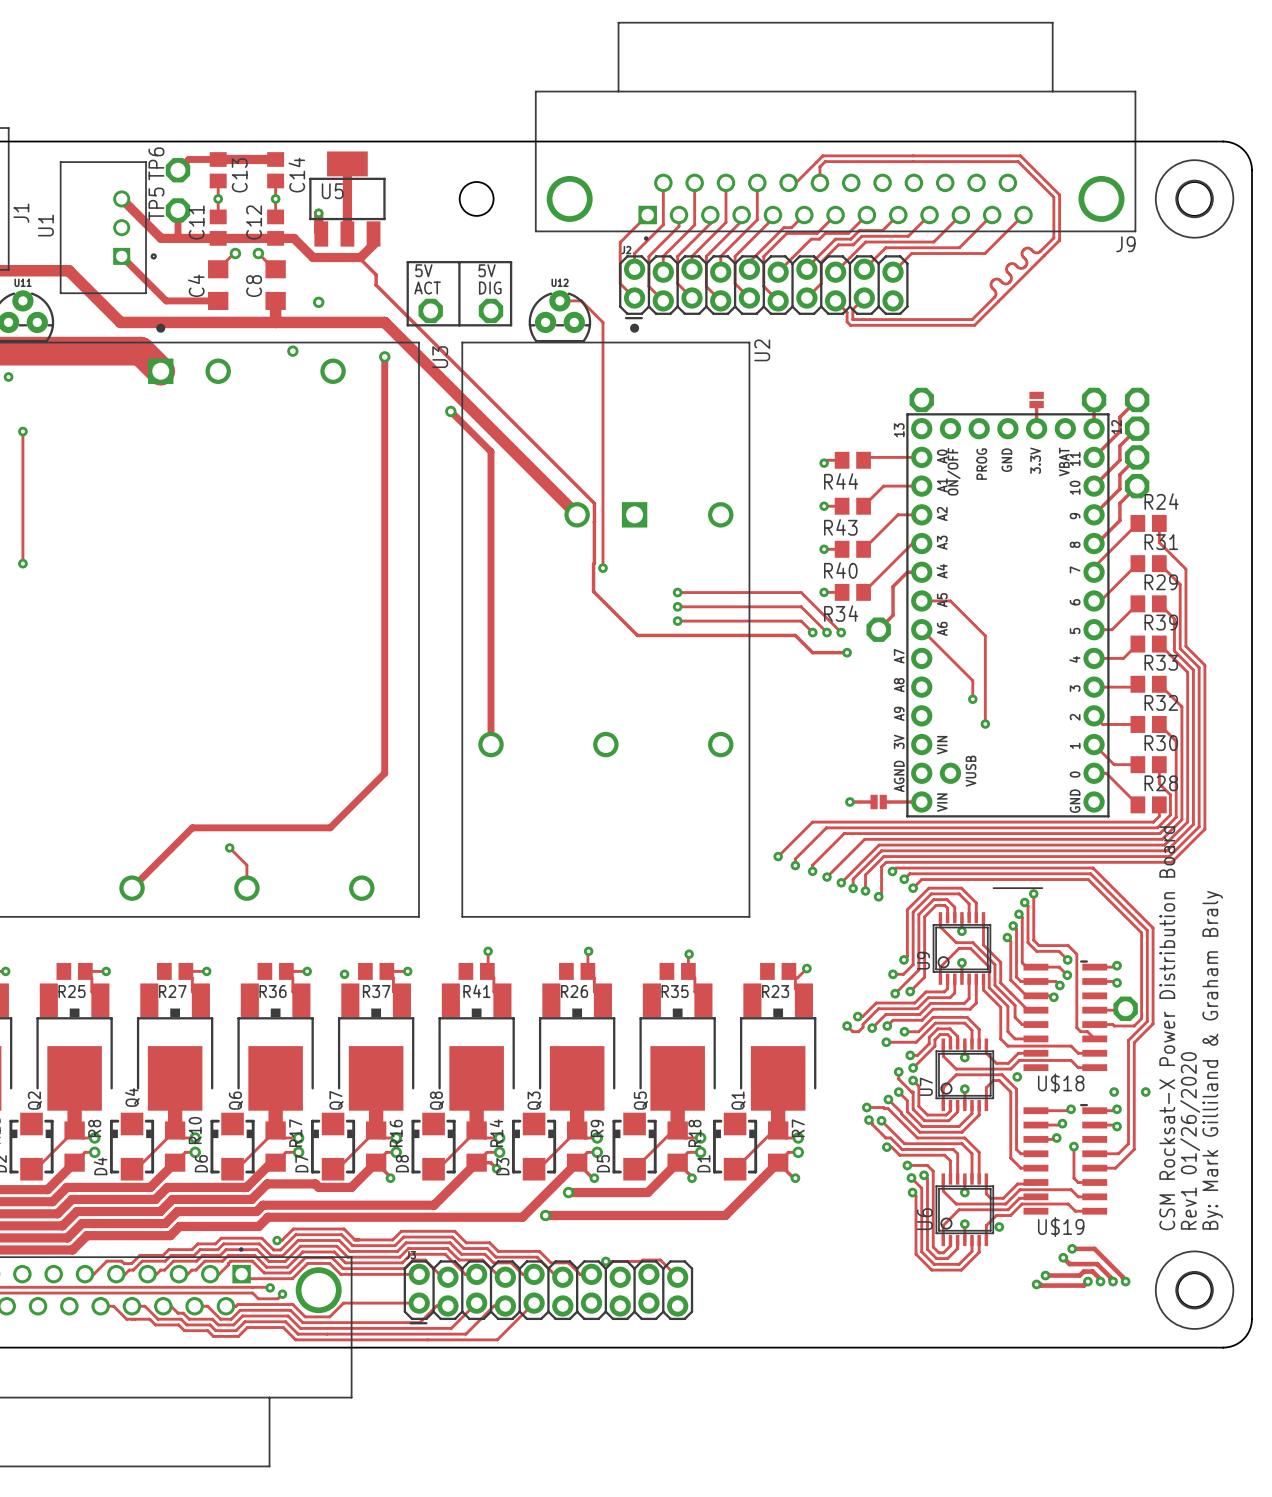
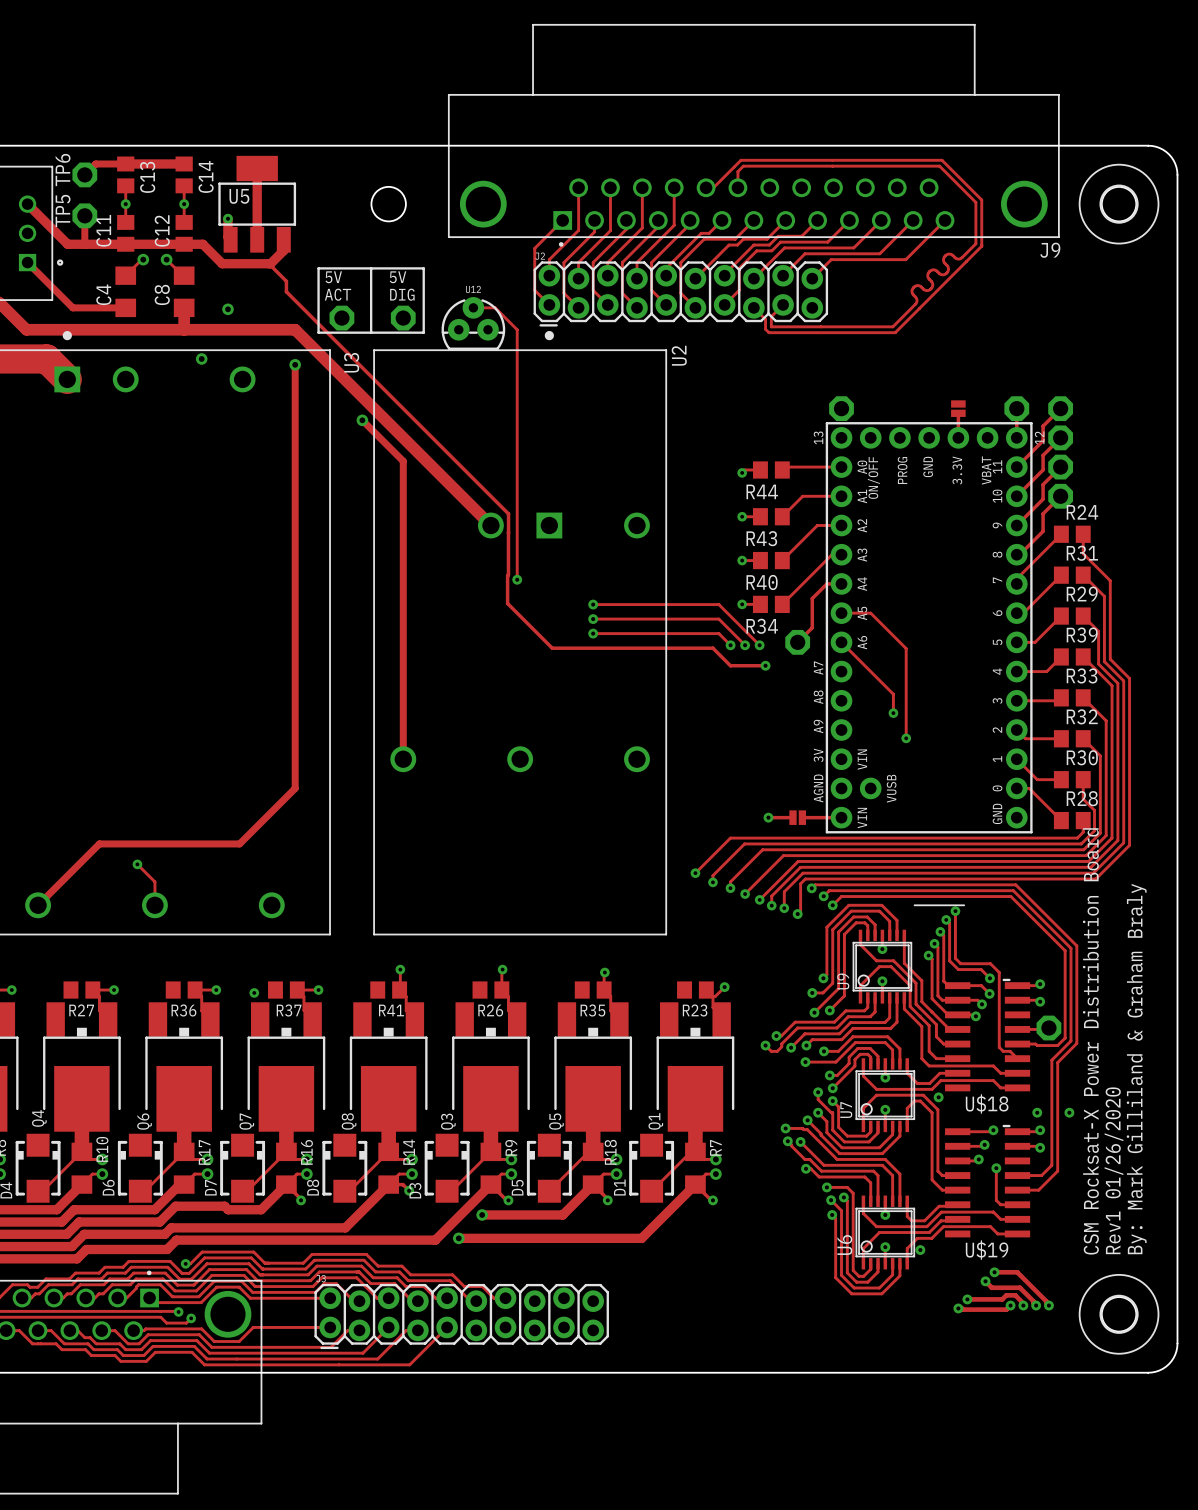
track: (605, 1261) (660, 1260) (677, 1277) -> none
via: (605, 1261) -> none

